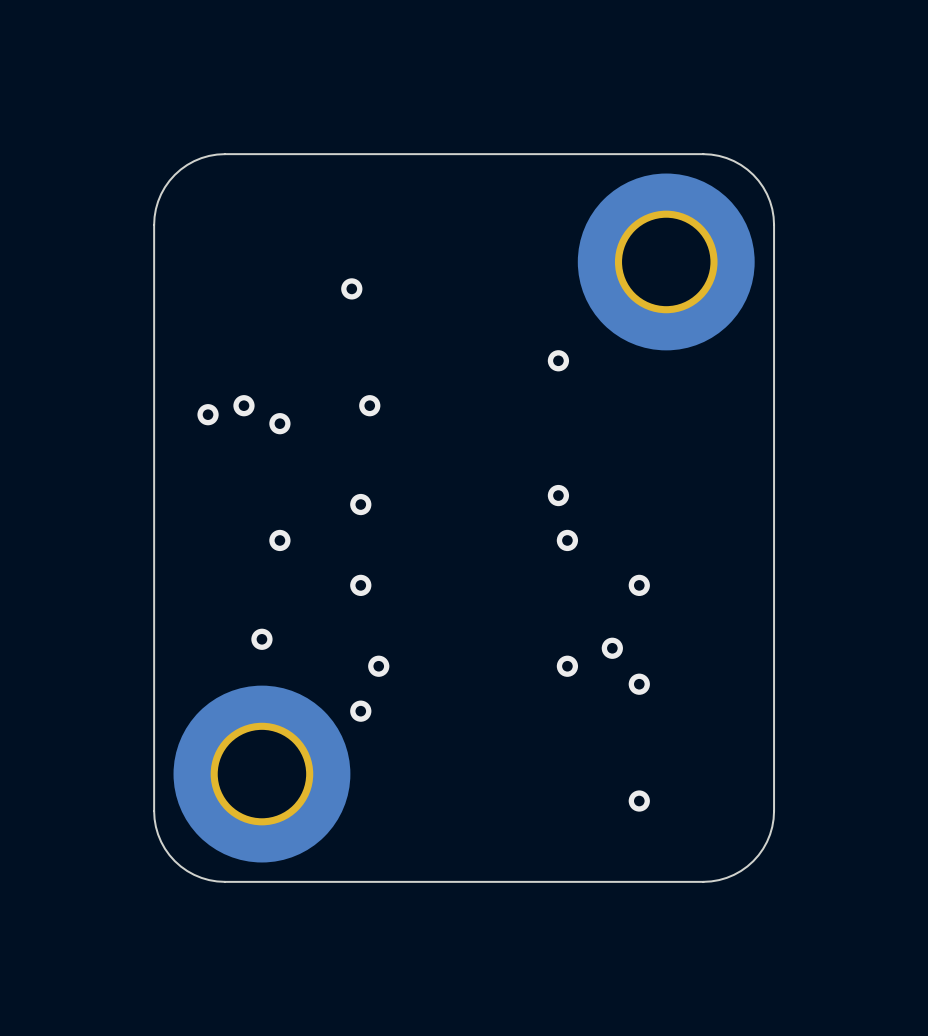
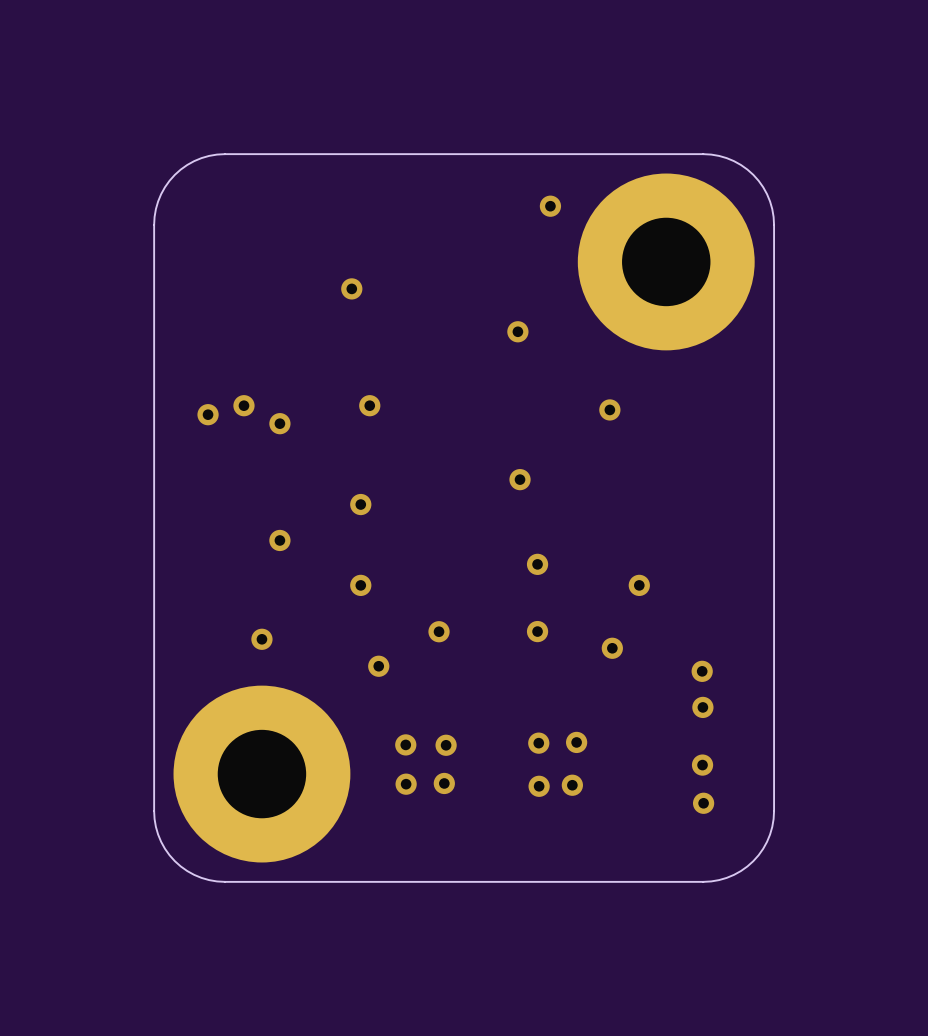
via: none -> (550, 206)
via: none -> (517, 331)
via: (558, 360) -> none
via: none -> (609, 409)
via: none -> (520, 479)
via: (558, 495) -> none
via: (567, 540) -> none
via: none -> (537, 564)
via: none -> (439, 631)
via: none -> (537, 631)
via: (567, 666) -> none
via: none -> (702, 671)
via: (639, 684) -> none
via: none -> (702, 707)
via: (360, 711) -> none
via: none -> (576, 742)
via: none -> (538, 743)
via: none -> (405, 744)
via: none -> (446, 745)
via: none -> (702, 765)
via: none -> (444, 783)
via: none -> (406, 784)
via: none -> (572, 785)
via: none -> (539, 786)
via: (639, 801) -> none
via: none -> (703, 803)

